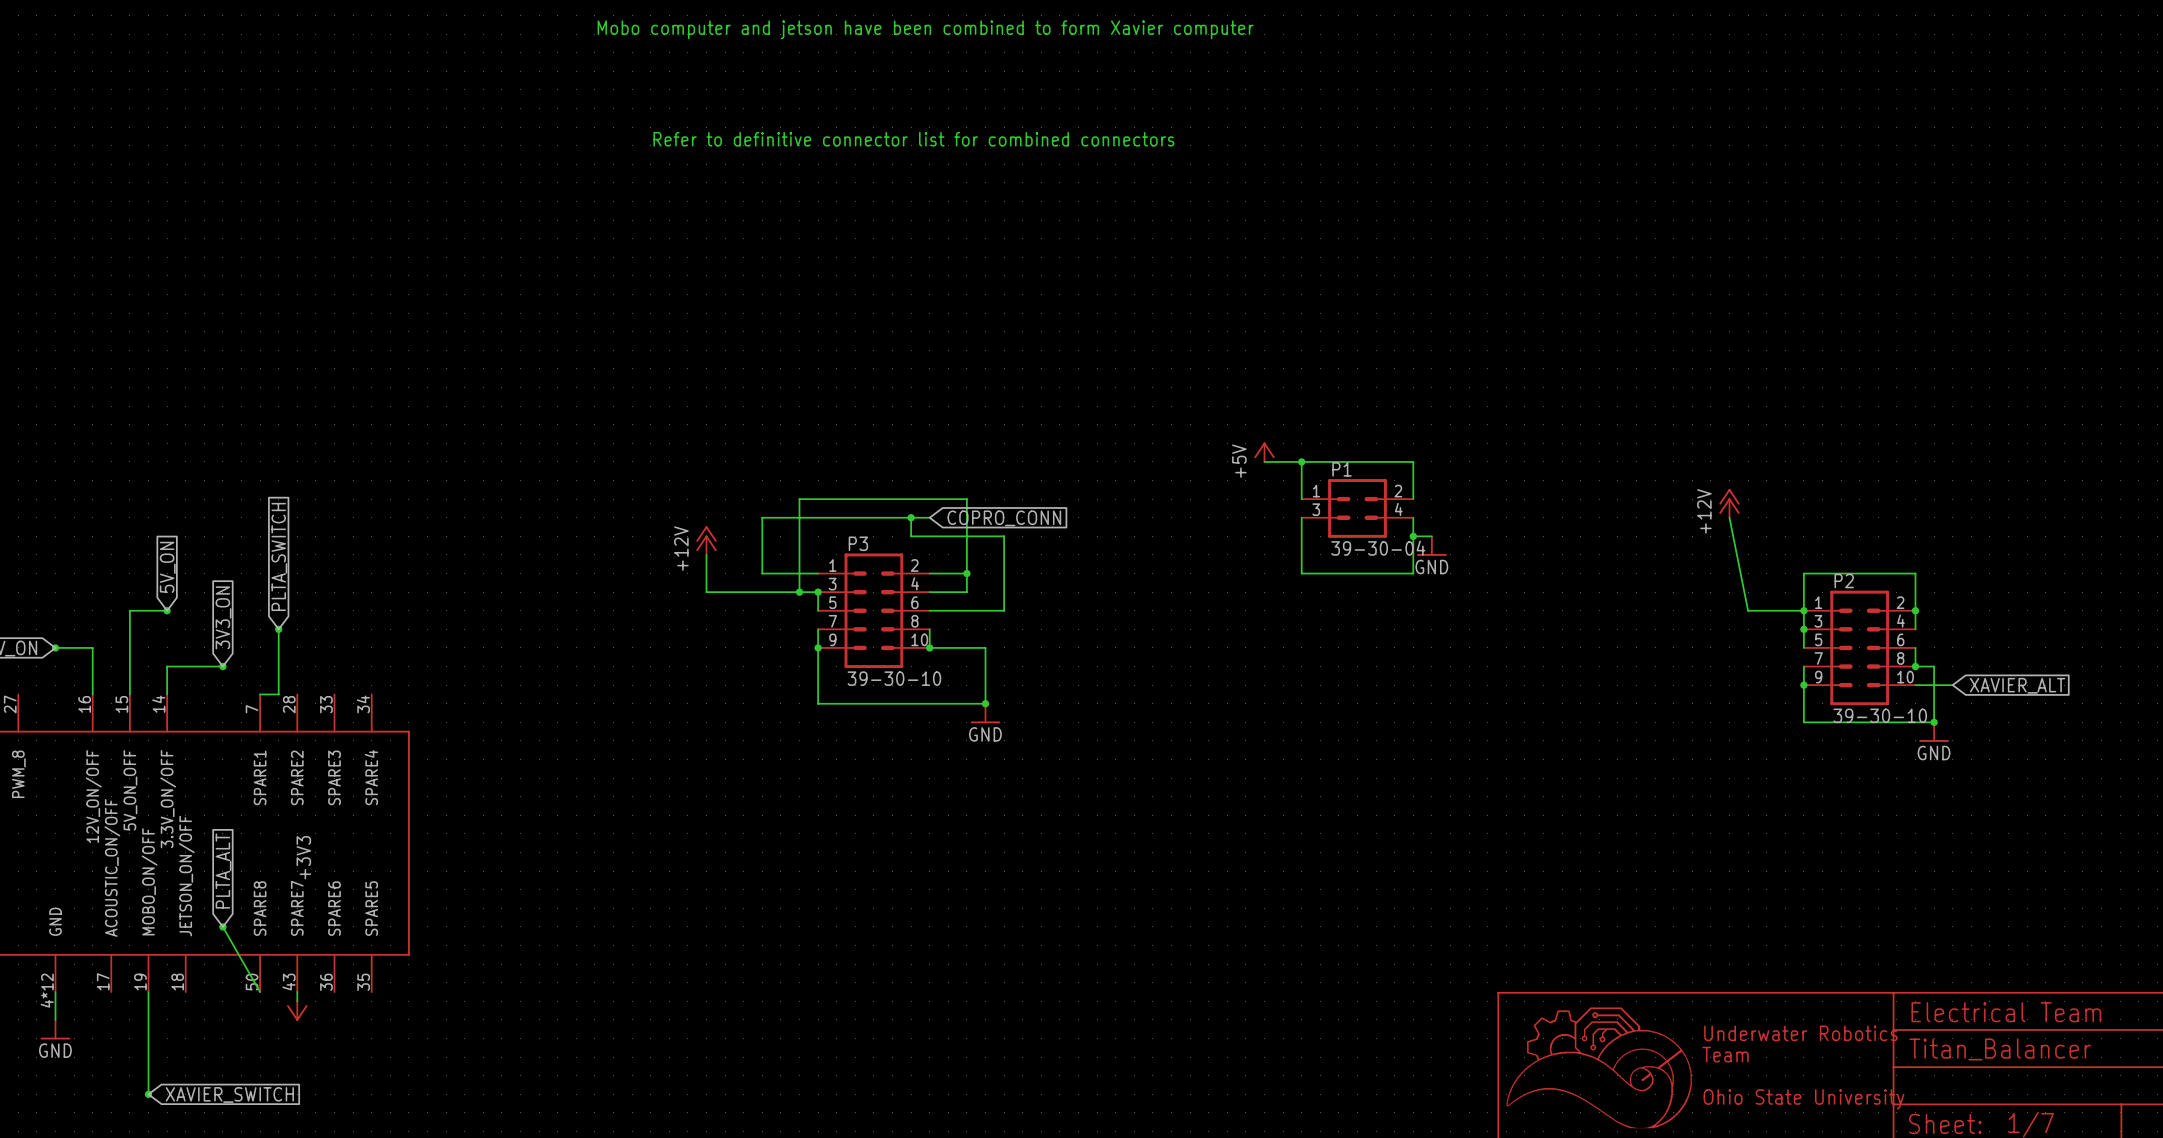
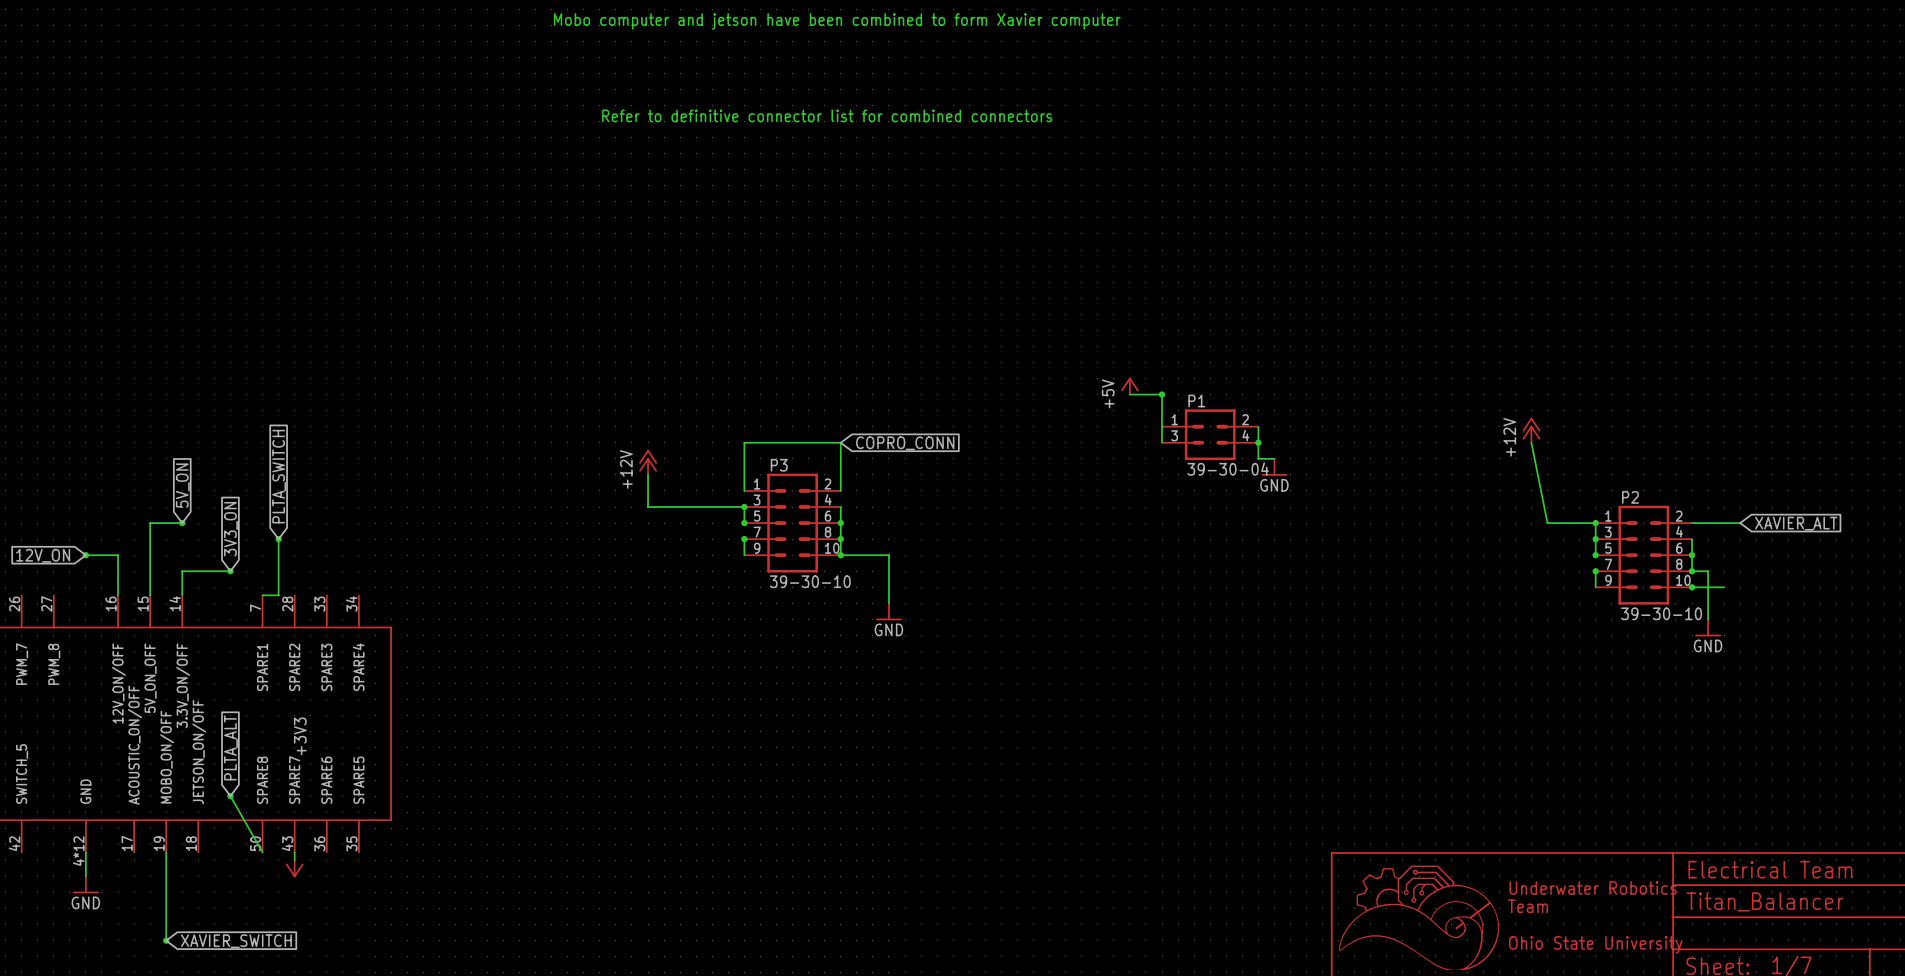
wire: (1301, 461) (1413, 461) (1413, 499) -> (1258, 442) (1258, 426)
wire: (818, 517) (762, 517) (762, 573) (818, 573) -> (744, 442) (744, 490)
wire: (911, 517) (911, 536) (1004, 536) (1004, 610) (929, 610) -> none
junction: (911, 517) -> none
wire: (1301, 517) (1301, 573) (1413, 573) (1413, 536) -> (1162, 442) (1162, 426)
junction position: (1413, 536) -> (1258, 442)
wire: (929, 573) (966, 573) -> (840, 490) (840, 442)
junction: (966, 573) -> none
wire: (799, 592) (799, 499) (966, 499) (966, 592) (929, 592) -> (840, 539) (840, 507)
junction: (799, 592) -> none
junction: none -> (744, 523)
junction: none -> (840, 523)
wire: (1803, 610) (1803, 573) (1915, 573) (1915, 629) -> (1692, 555) (1692, 539)
wire: none -> (1692, 523) (1740, 523)
junction: (1915, 610) -> none
junction: none -> (744, 539)
junction: none -> (840, 539)
wire: (818, 647) (818, 703) (985, 703) -> none
junction: (818, 647) -> none
junction: none -> (1595, 555)
junction: none -> (1692, 555)
junction: none -> (1595, 571)
wire: (1803, 685) (1803, 722) (1934, 722) -> none
junction: (1803, 685) -> none
junction: none -> (1692, 587)
global label position: XAVIER_ALT (2017, 685) -> XAVIER_ALT (1796, 523)
junction: (985, 703) -> none
junction: (1934, 722) -> none

